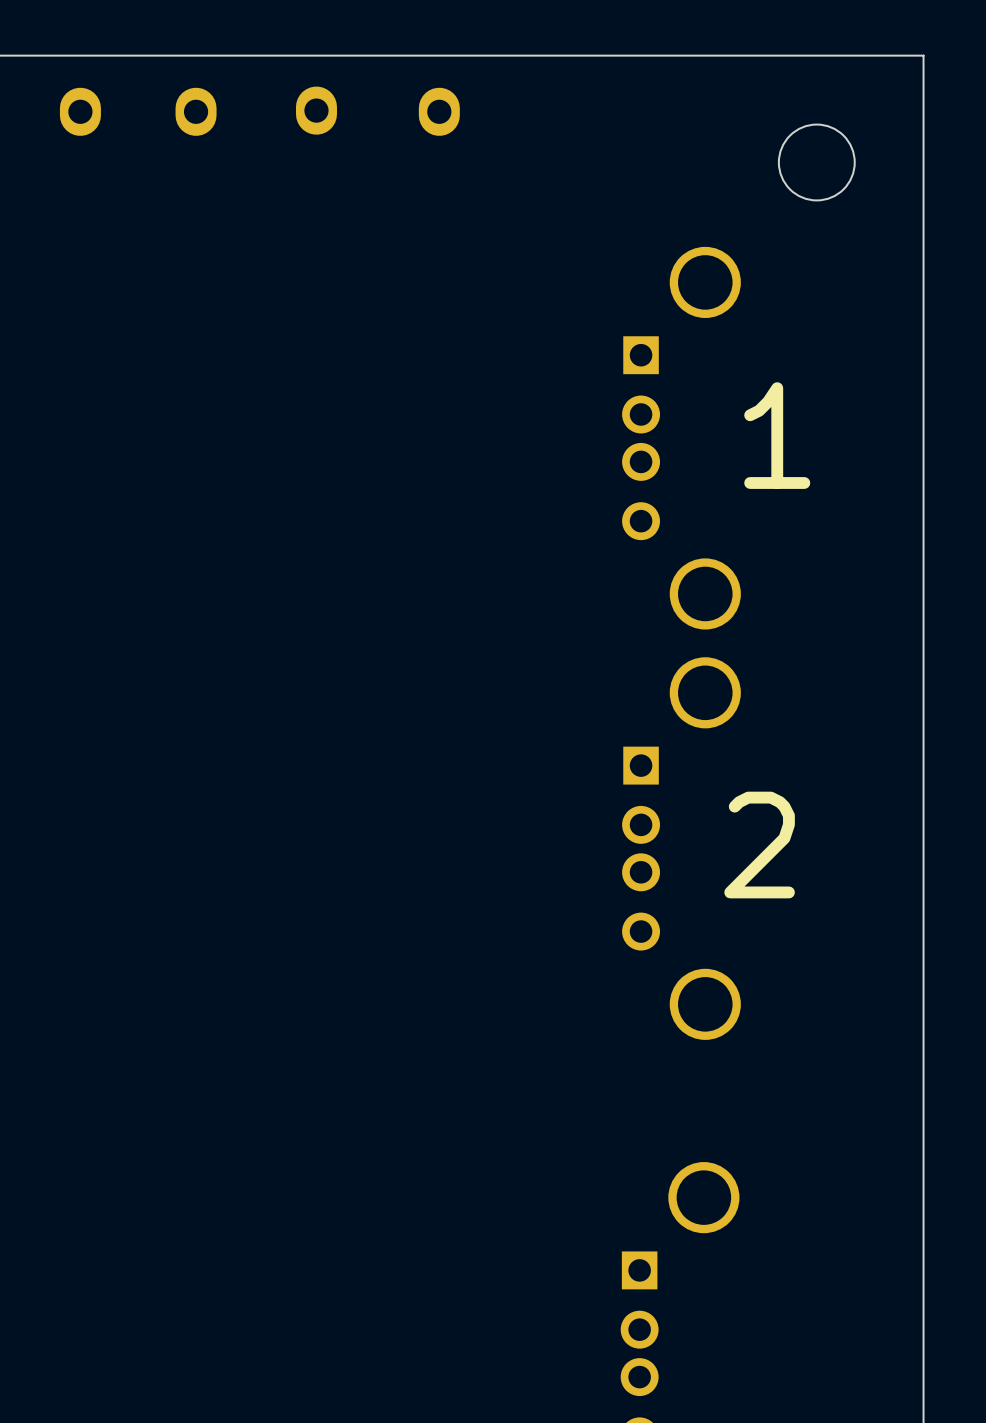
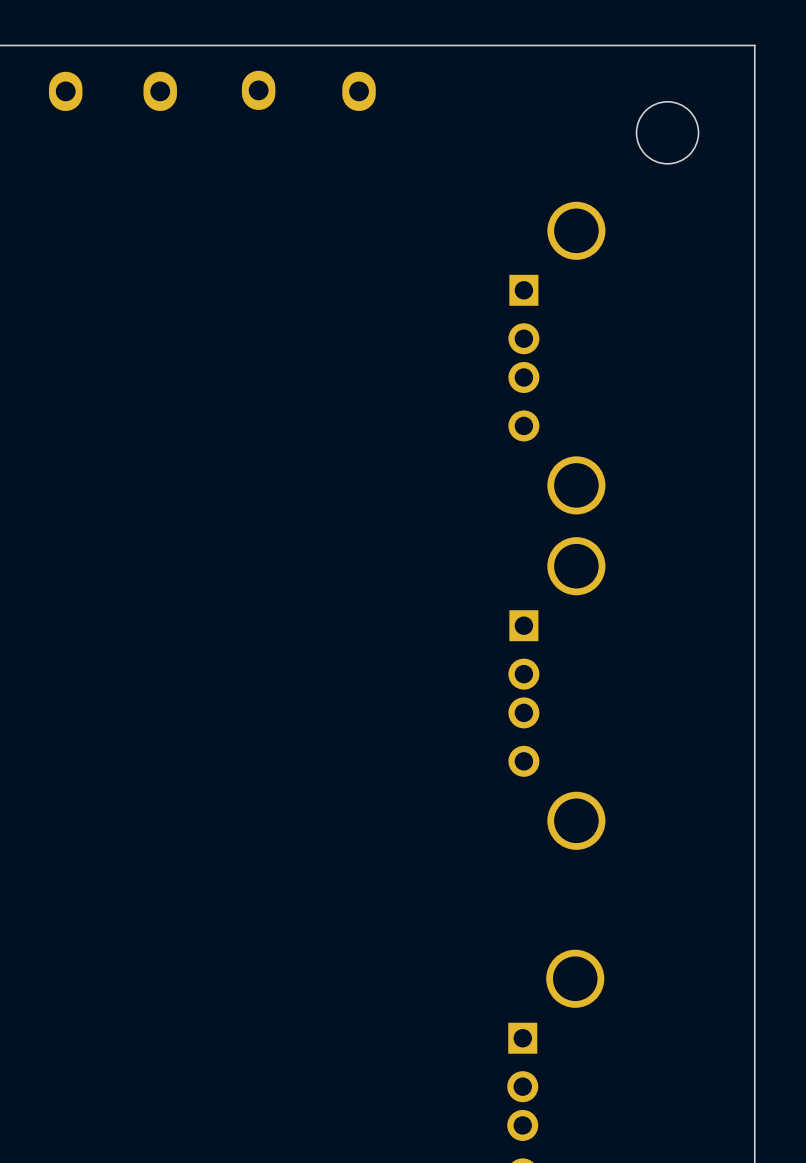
text: 1 (777, 435) -> none
text: 2 (759, 845) -> none

